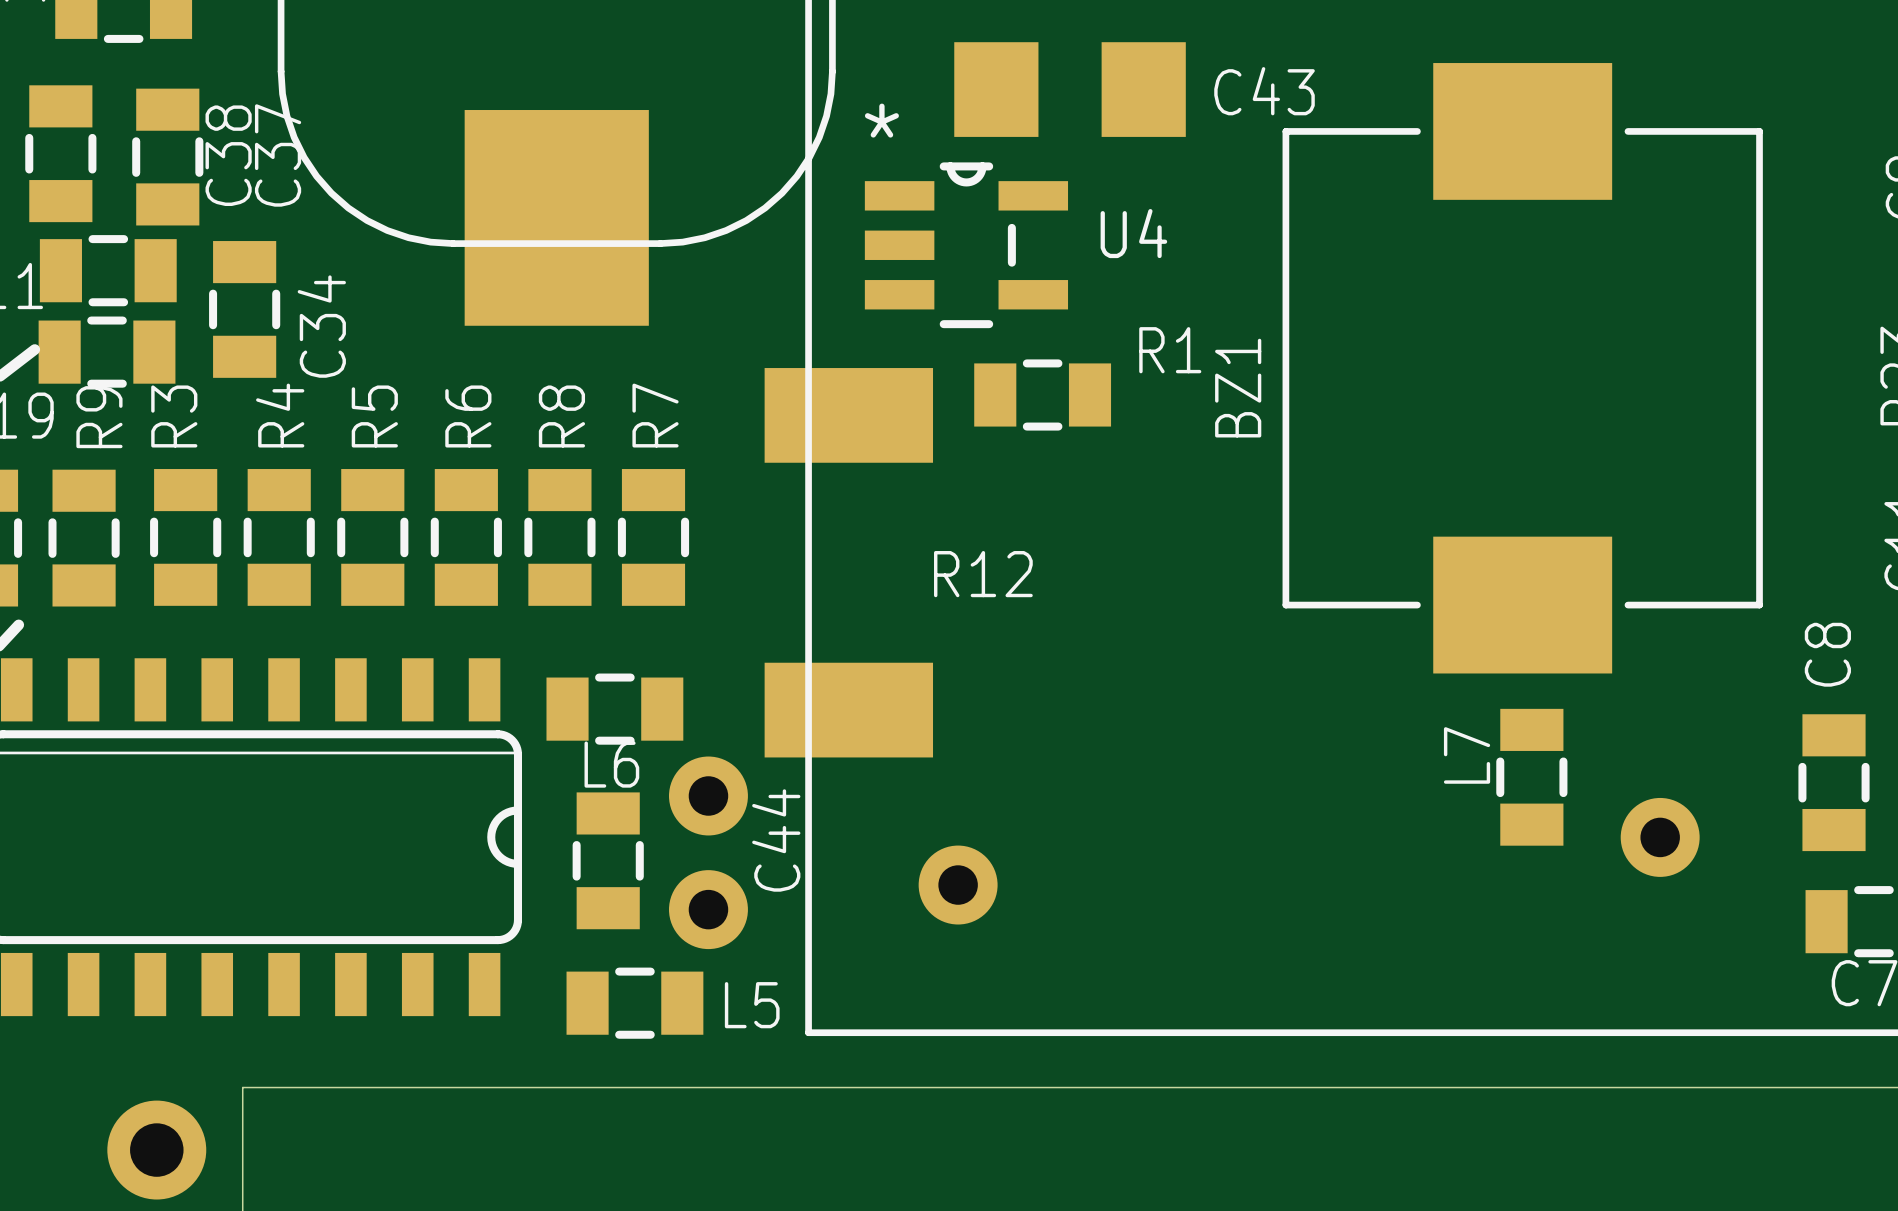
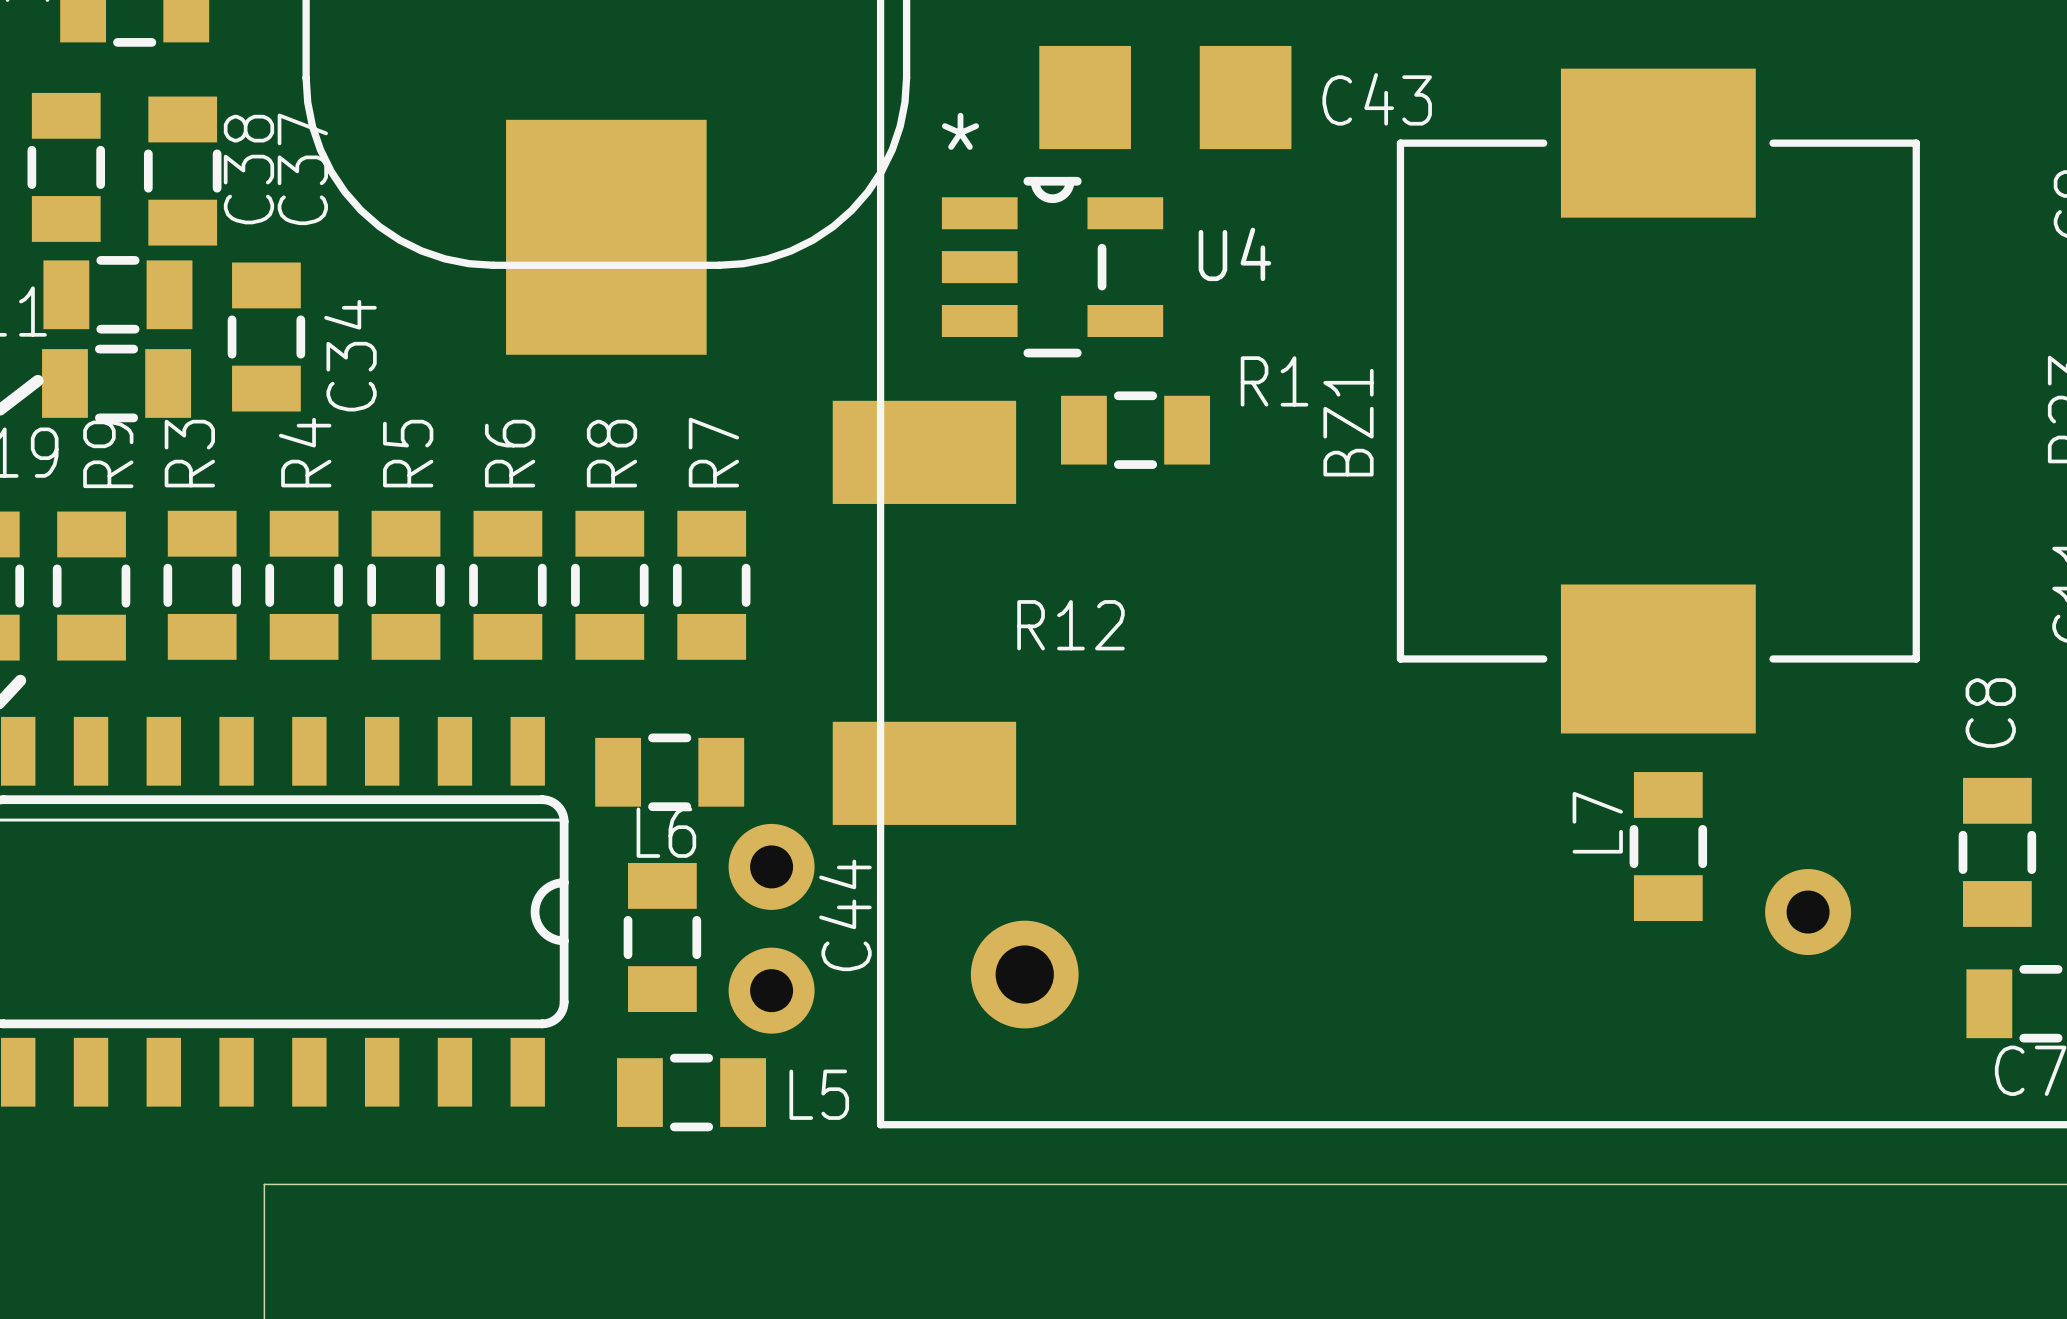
part footprint: [918, 845, 998, 925] -> [970, 920, 1079, 1029]
part: (156, 1150) -> none

